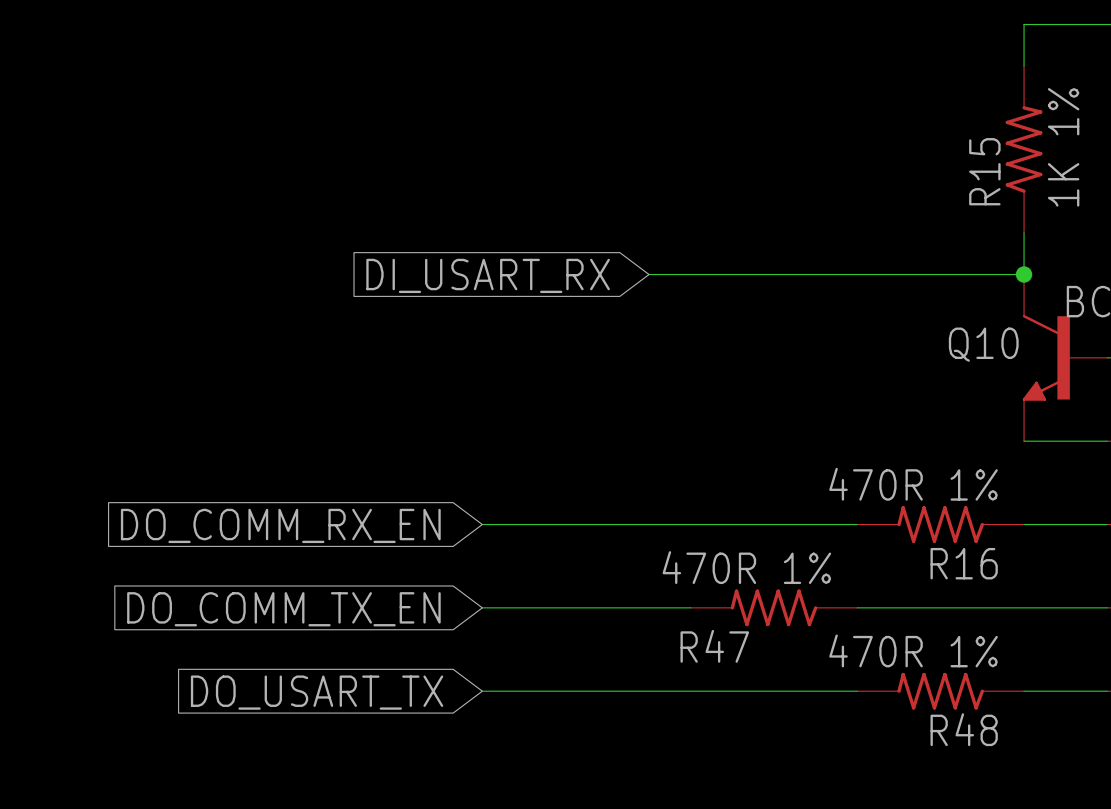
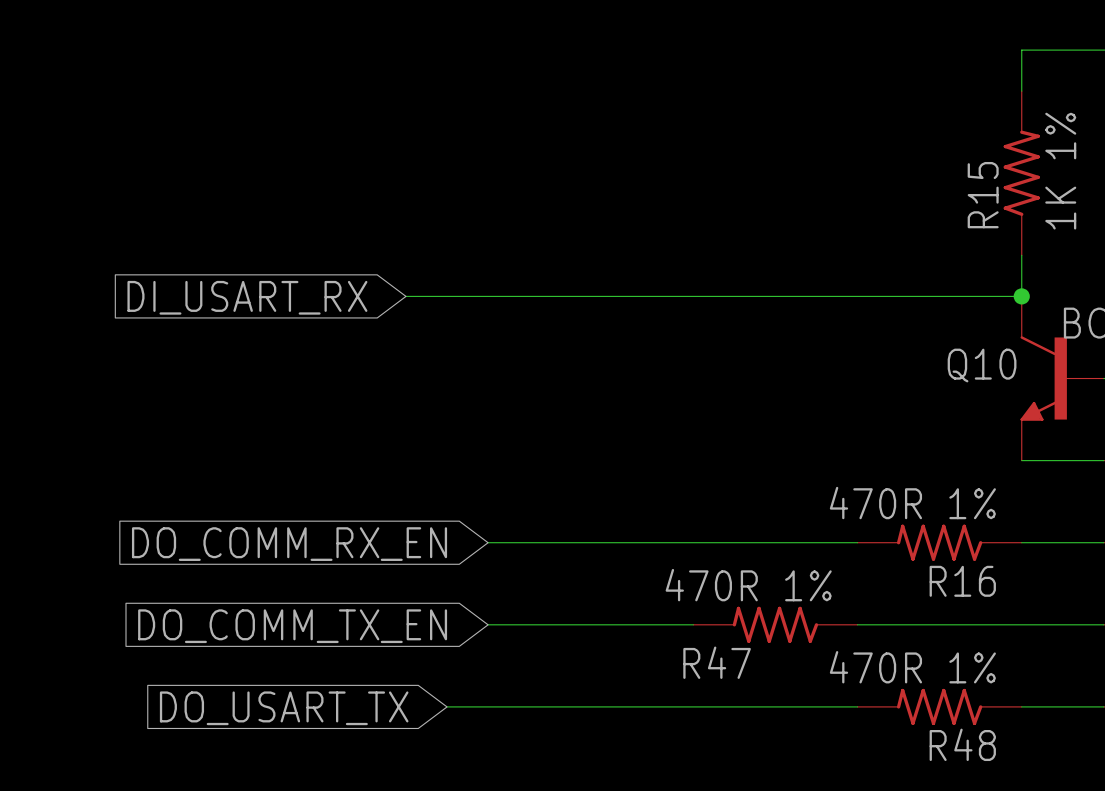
wire: none -> (405, 296) (652, 296)
global label position: DI_USART_RX (488, 275) -> DI_USART_RX (247, 297)
wire: none -> (447, 706) (488, 706)
global label position: DO_USART_TX (317, 692) -> DO_USART_TX (284, 708)

